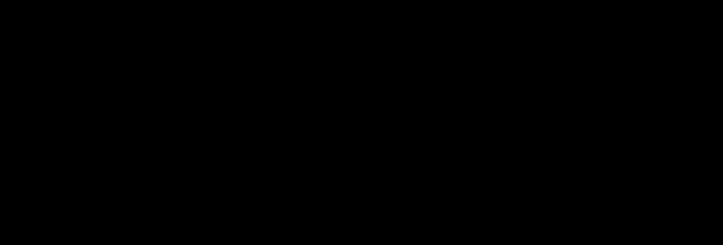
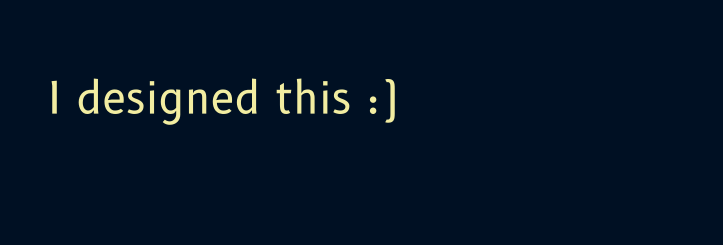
text: none -> I designed this :) (223, 101)

